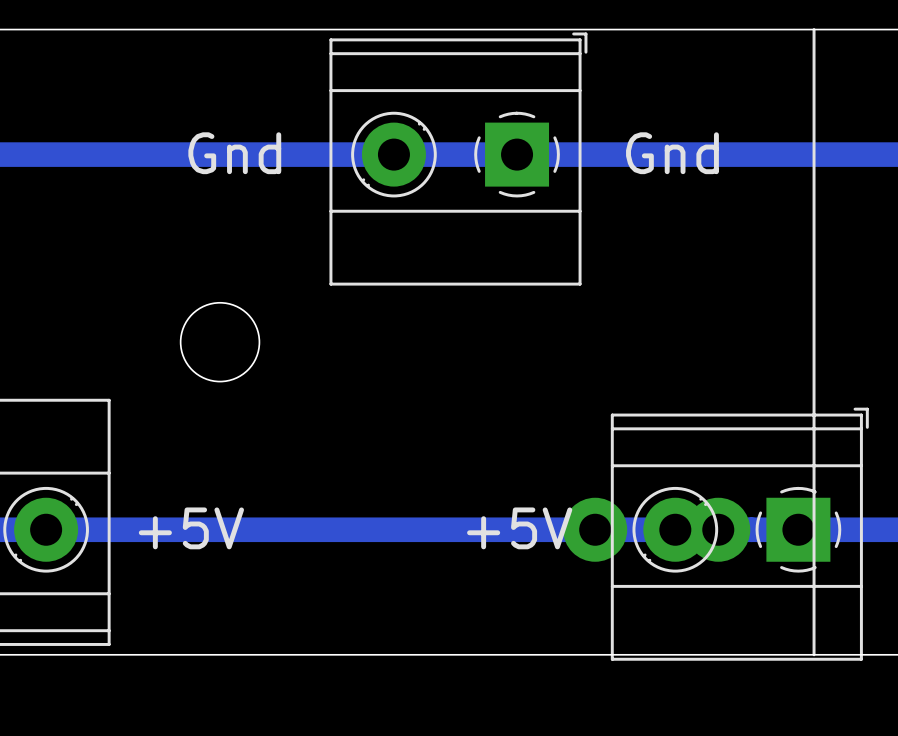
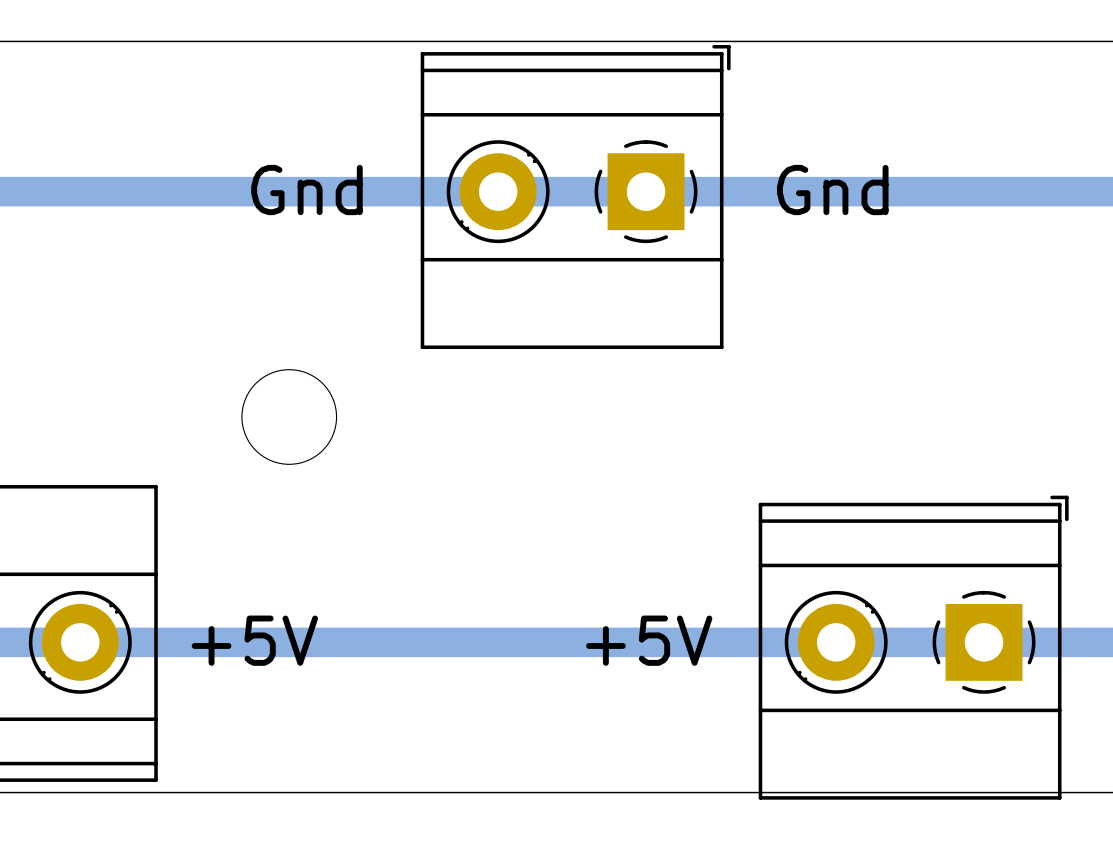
line: (814, 29) (814, 654) -> none
via: (595, 529) -> none
via: (718, 529) -> none

